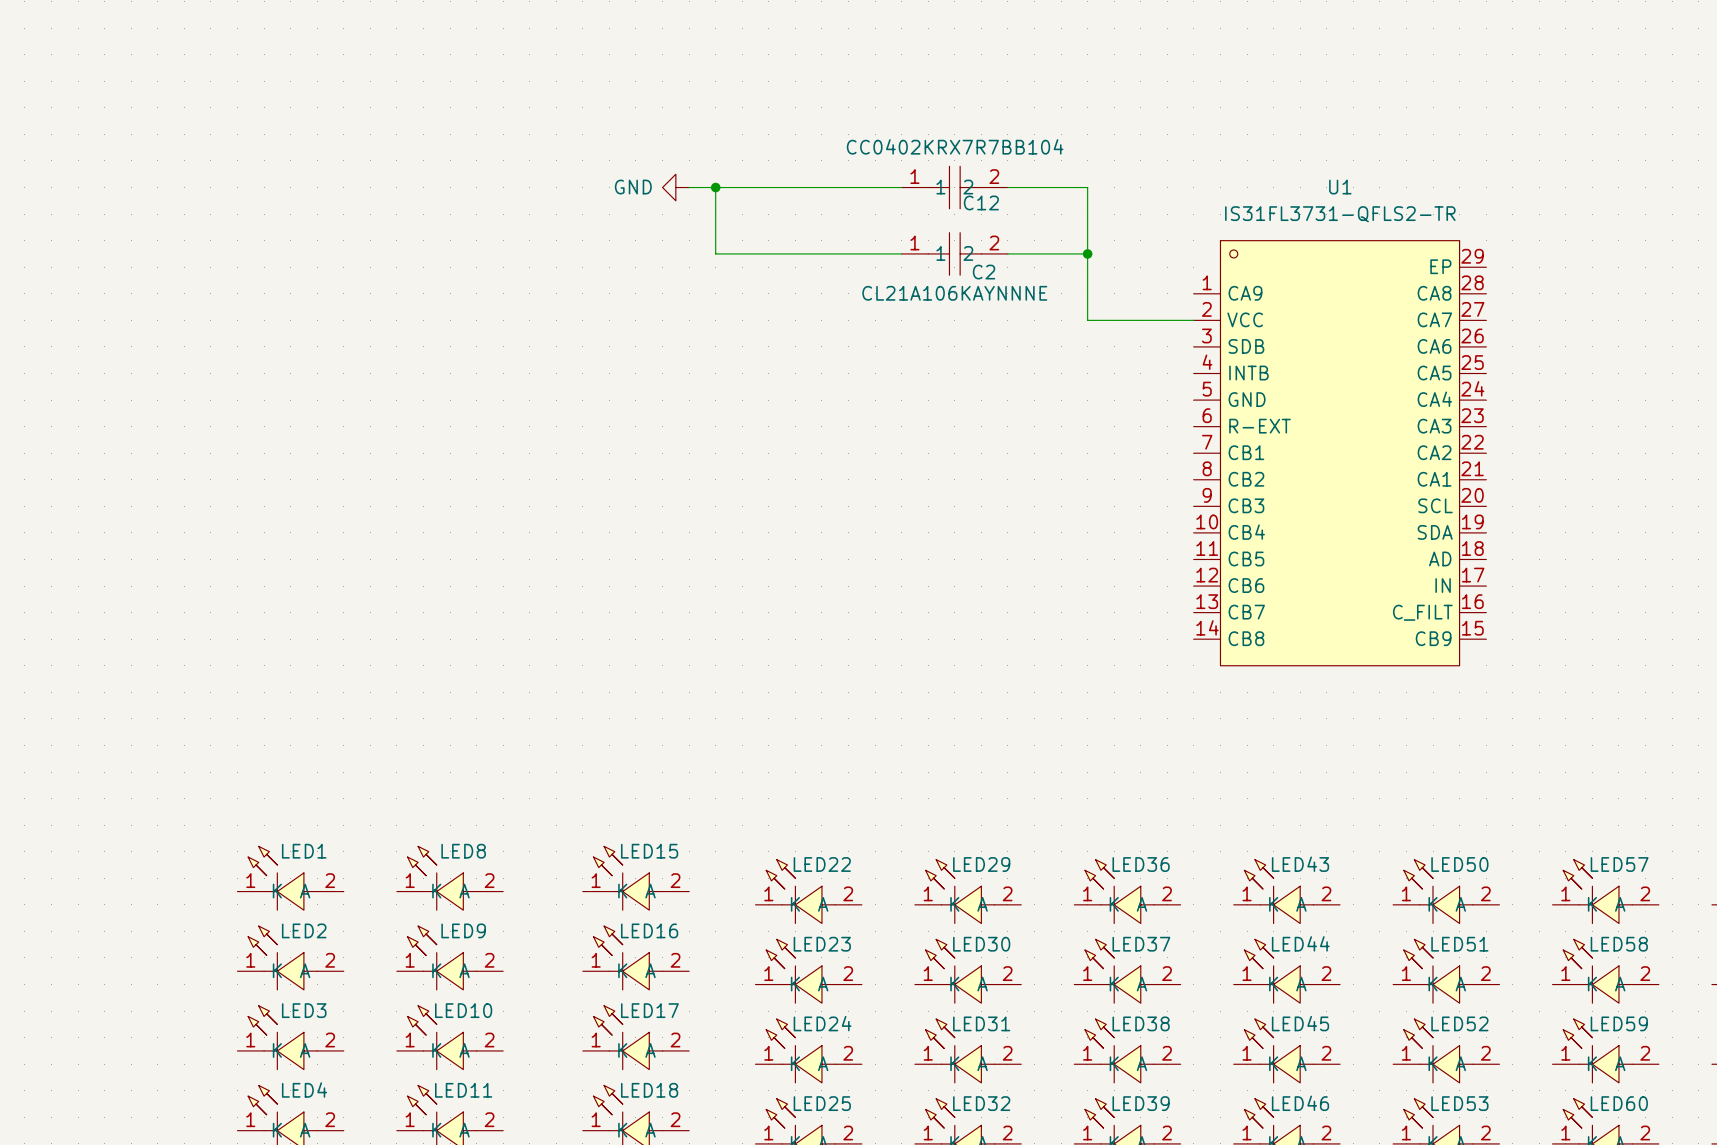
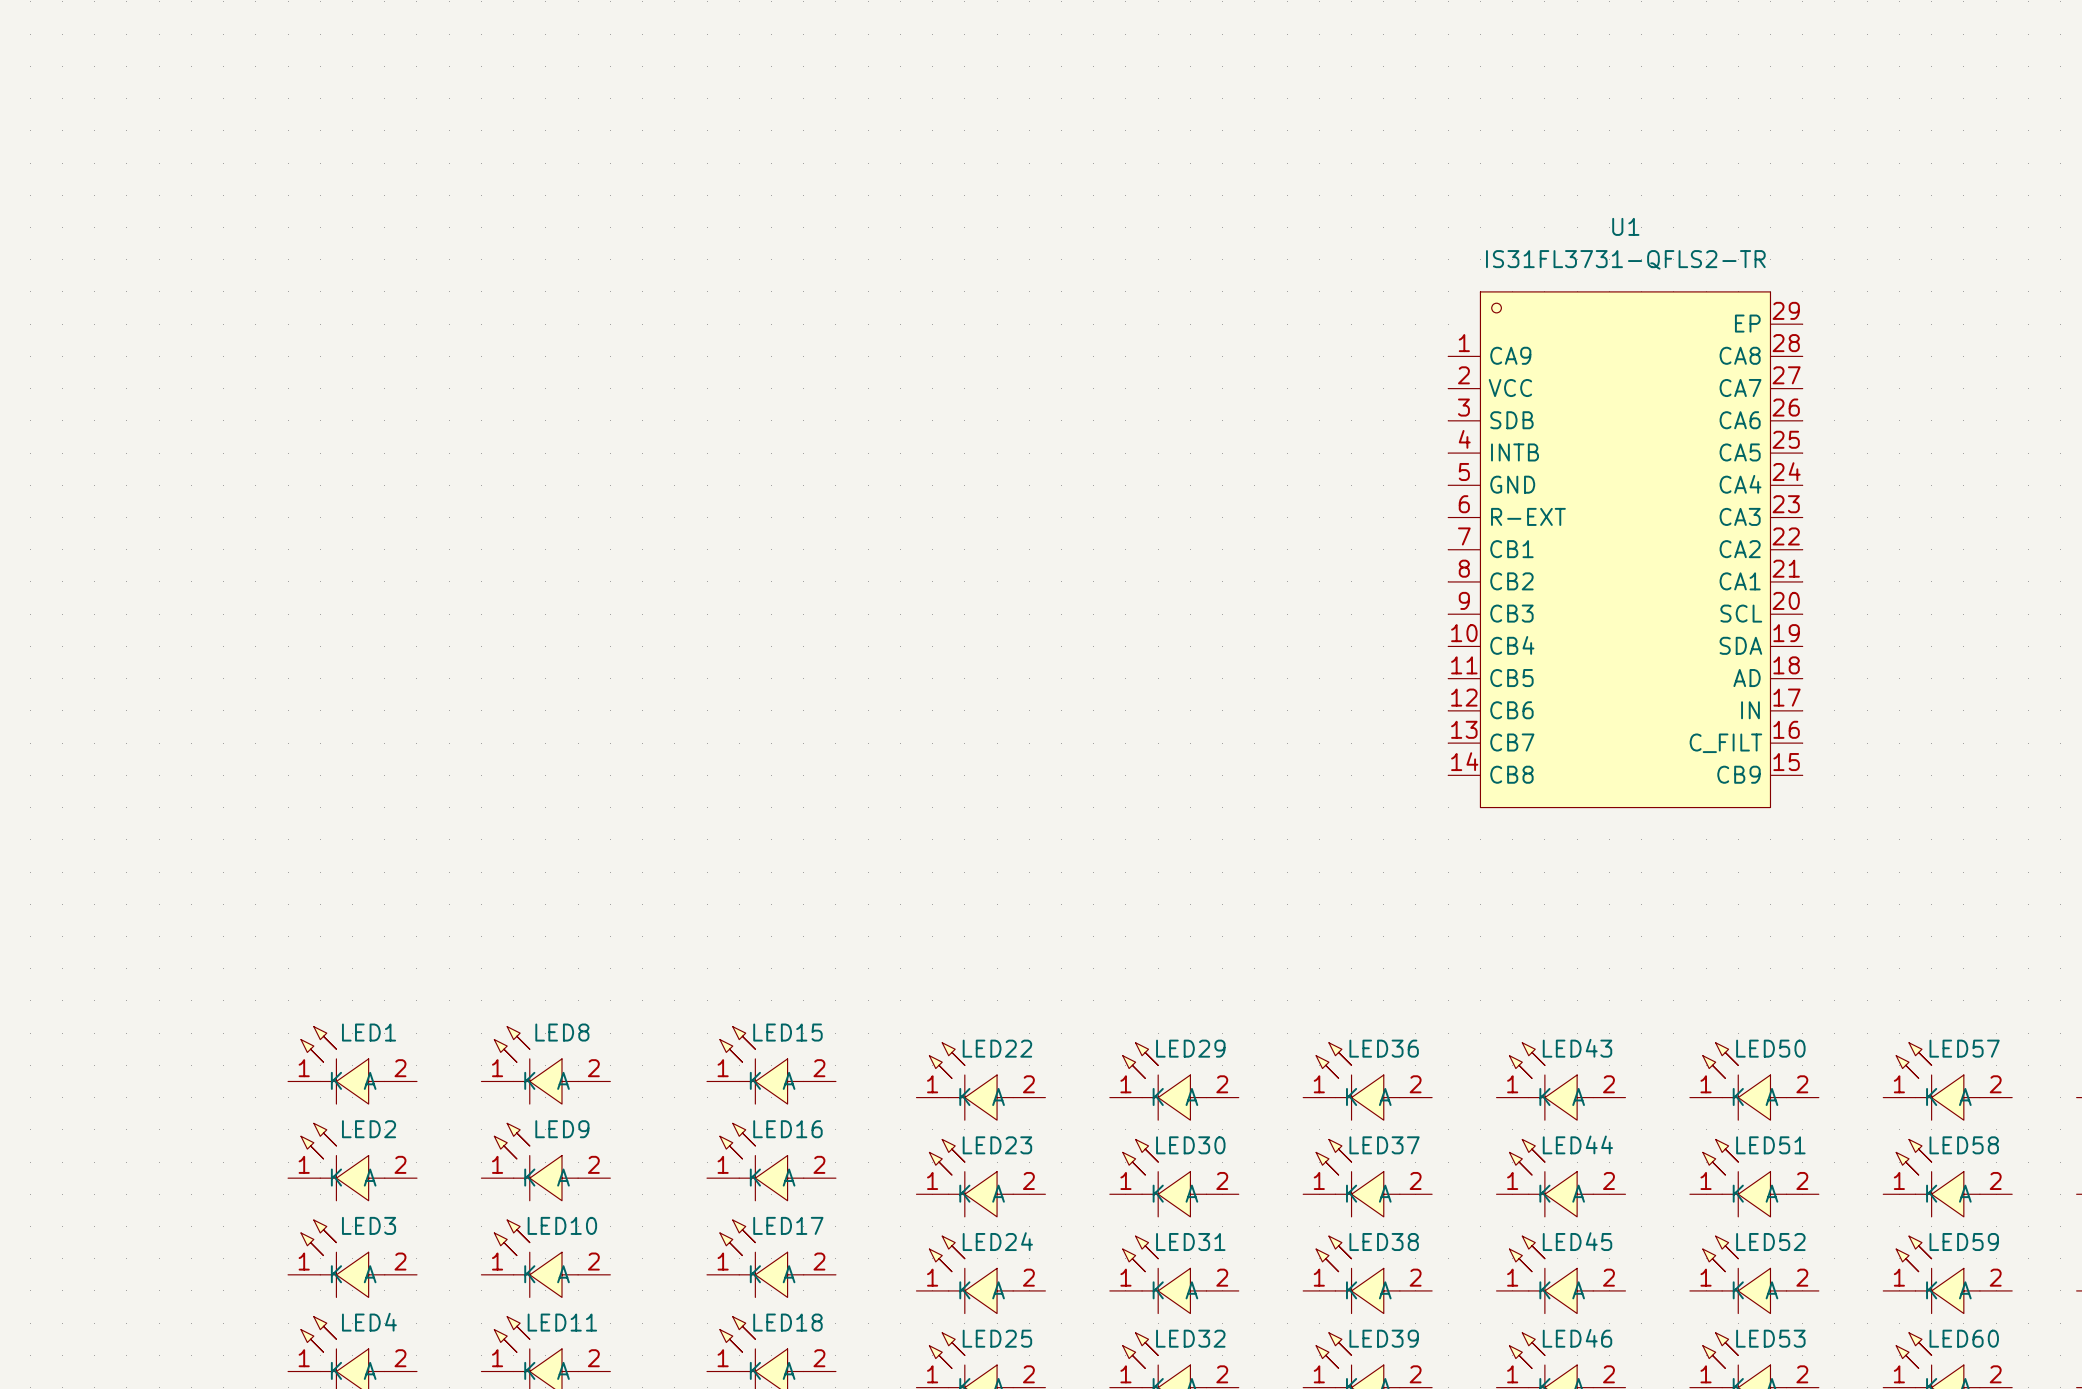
power symbol: GND (675, 187) -> none
wire: (689, 187) (901, 187) -> none
wire: (715, 187) (715, 253) (901, 253) -> none
junction: (715, 187) -> none
C12: CC0402KRX7R7BB104 (954, 187) -> none
wire: (1007, 187) (1087, 187) (1087, 320) (1193, 320) -> none
C2: CL21A106KAYNNNE (954, 253) -> none
wire: (1007, 253) (1087, 253) -> none
junction: (1087, 253) -> none

